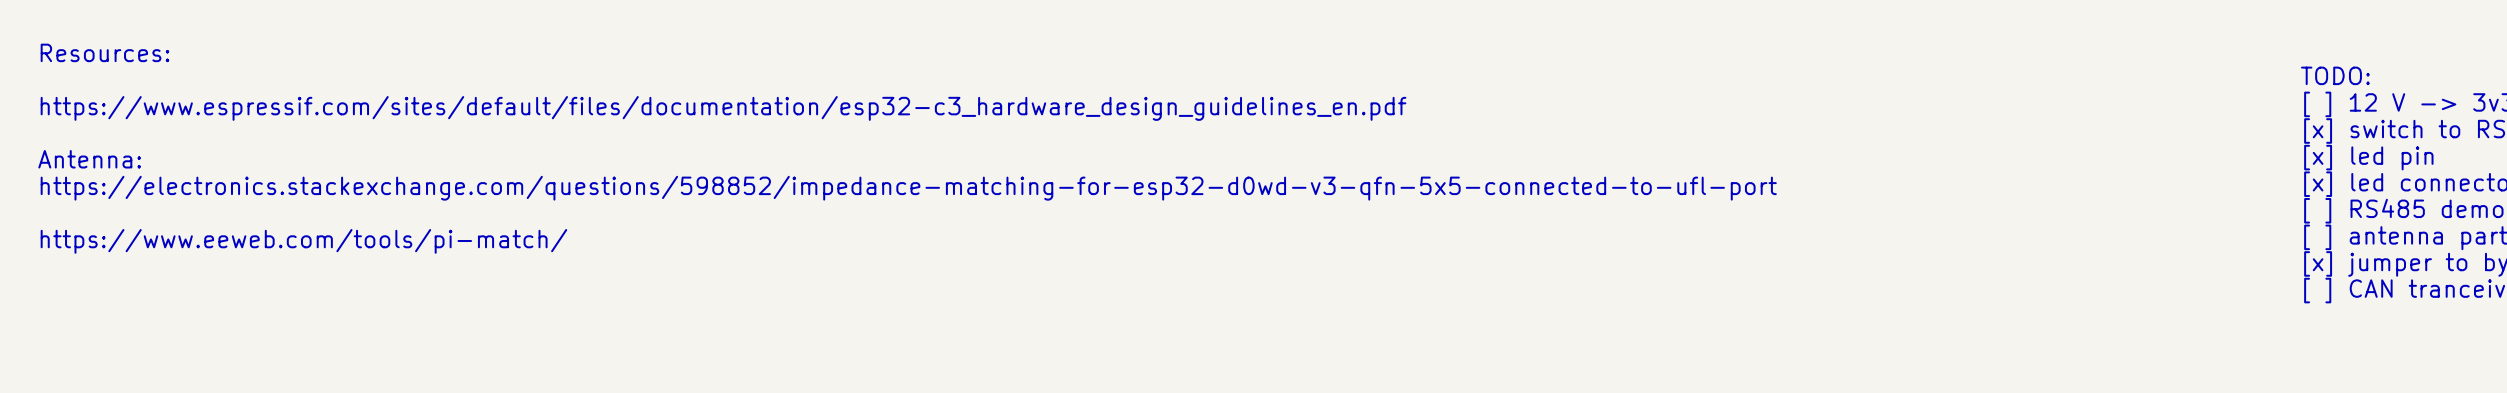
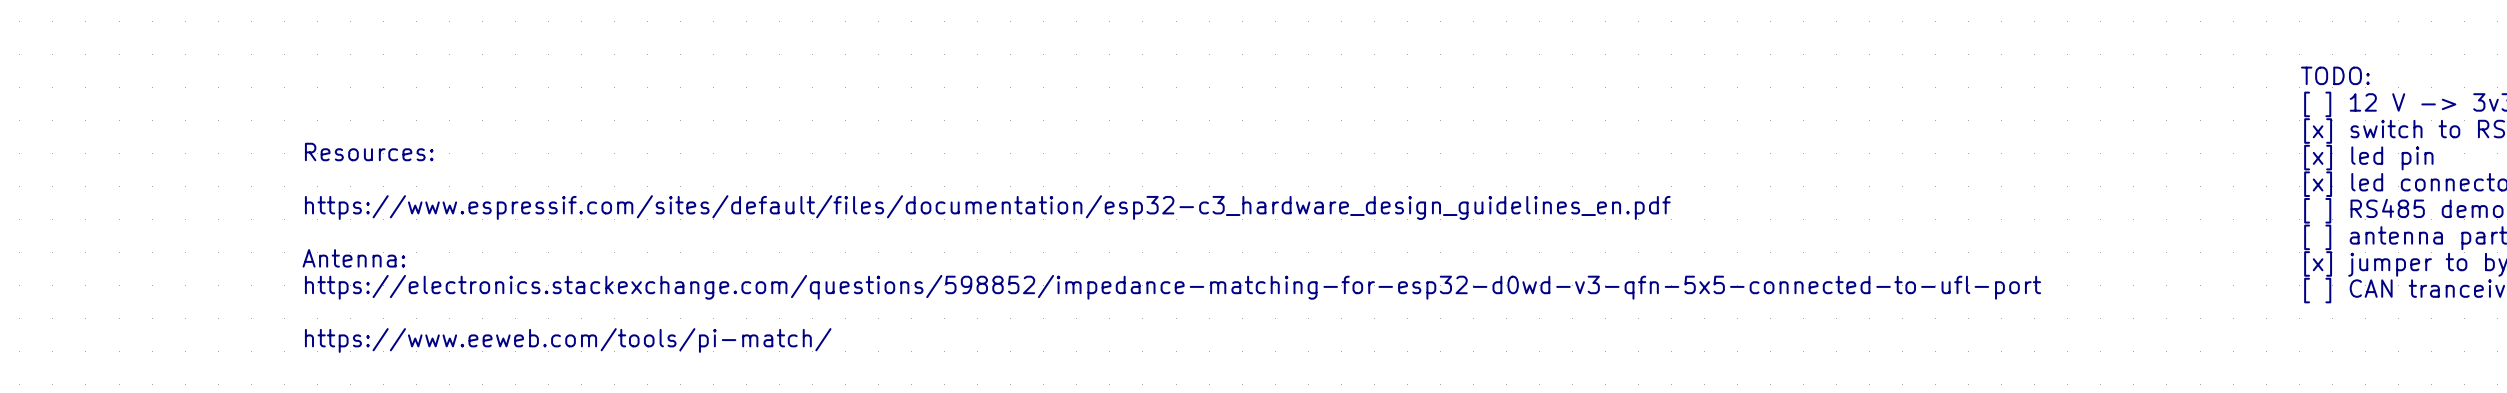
text position: Resources: (104, 52) -> Resources: (369, 151)
text position: https://www.espressif.com/sites/default/files/documentation/esp32-c3_hardware_design_guidelines_en.pdf (723, 108) -> https://www.espressif.com/sites/default/files/documentation/esp32-c3_hardware_design_guidelines_en.pdf (987, 207)
text position: Antenna: (89, 159) -> Antenna: (353, 258)
text position: https://electronics.stackexchange.com/questions/598852/impedance-matching-for-esp32-d0wd-v3-qfn-5x5-connected-to-ufl-port (908, 188) -> https://electronics.stackexchange.com/questions/598852/impedance-matching-for-esp32-d0wd-v3-qfn-5x5-connected-to-ufl-port (1172, 287)
text position: https://www.eeweb.com/tools/pi-match/ (303, 241) -> https://www.eeweb.com/tools/pi-match/ (568, 340)

